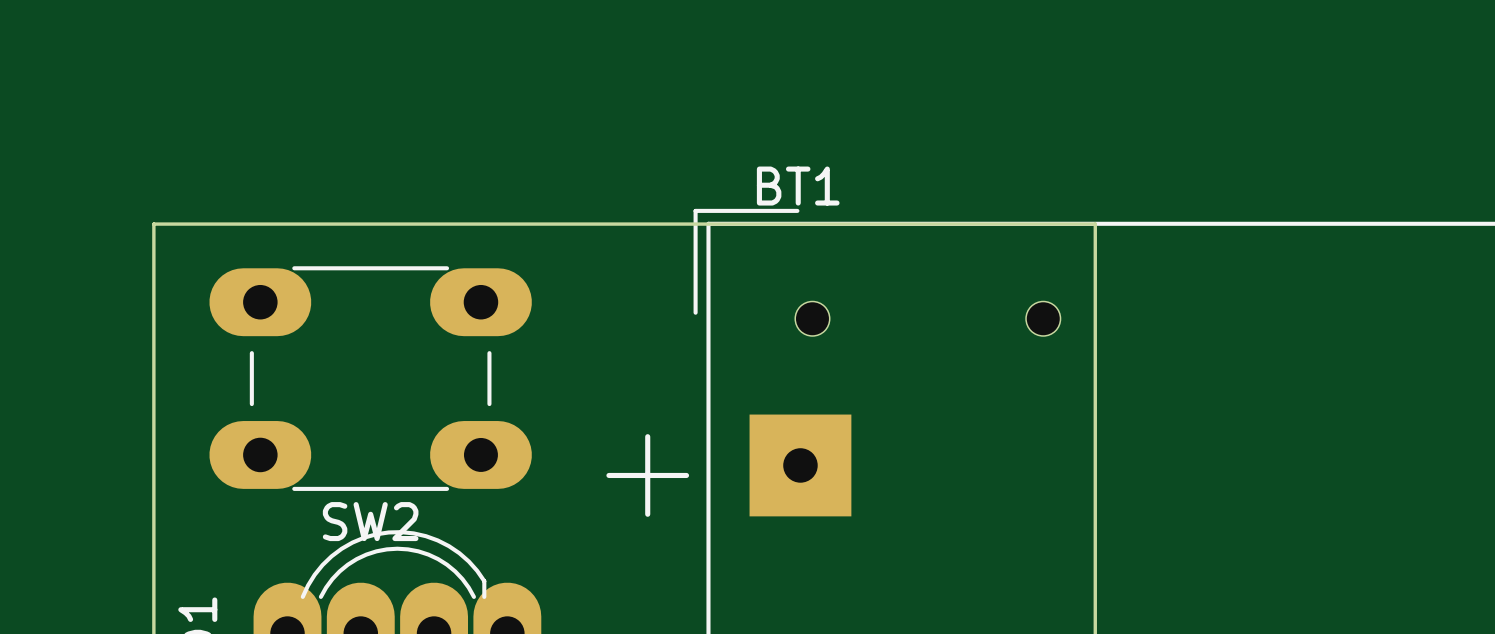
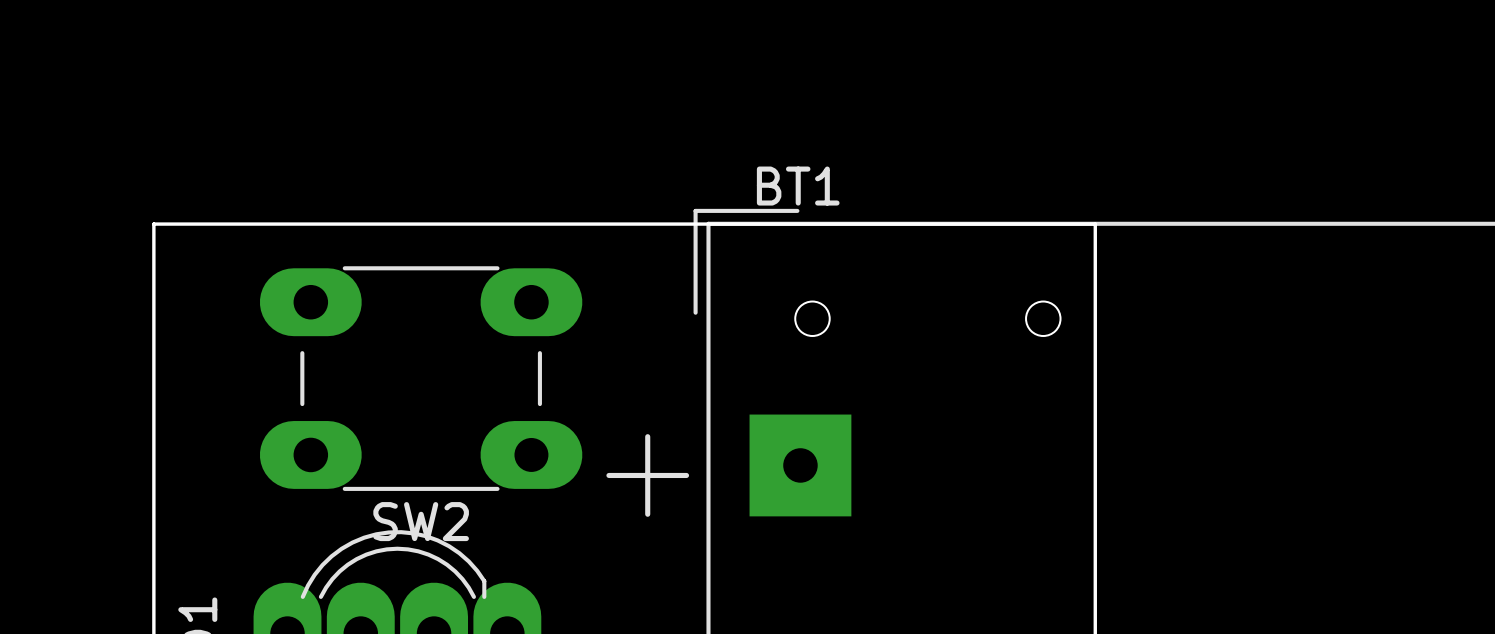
SW2 position: (370, 378) -> (421, 378)

